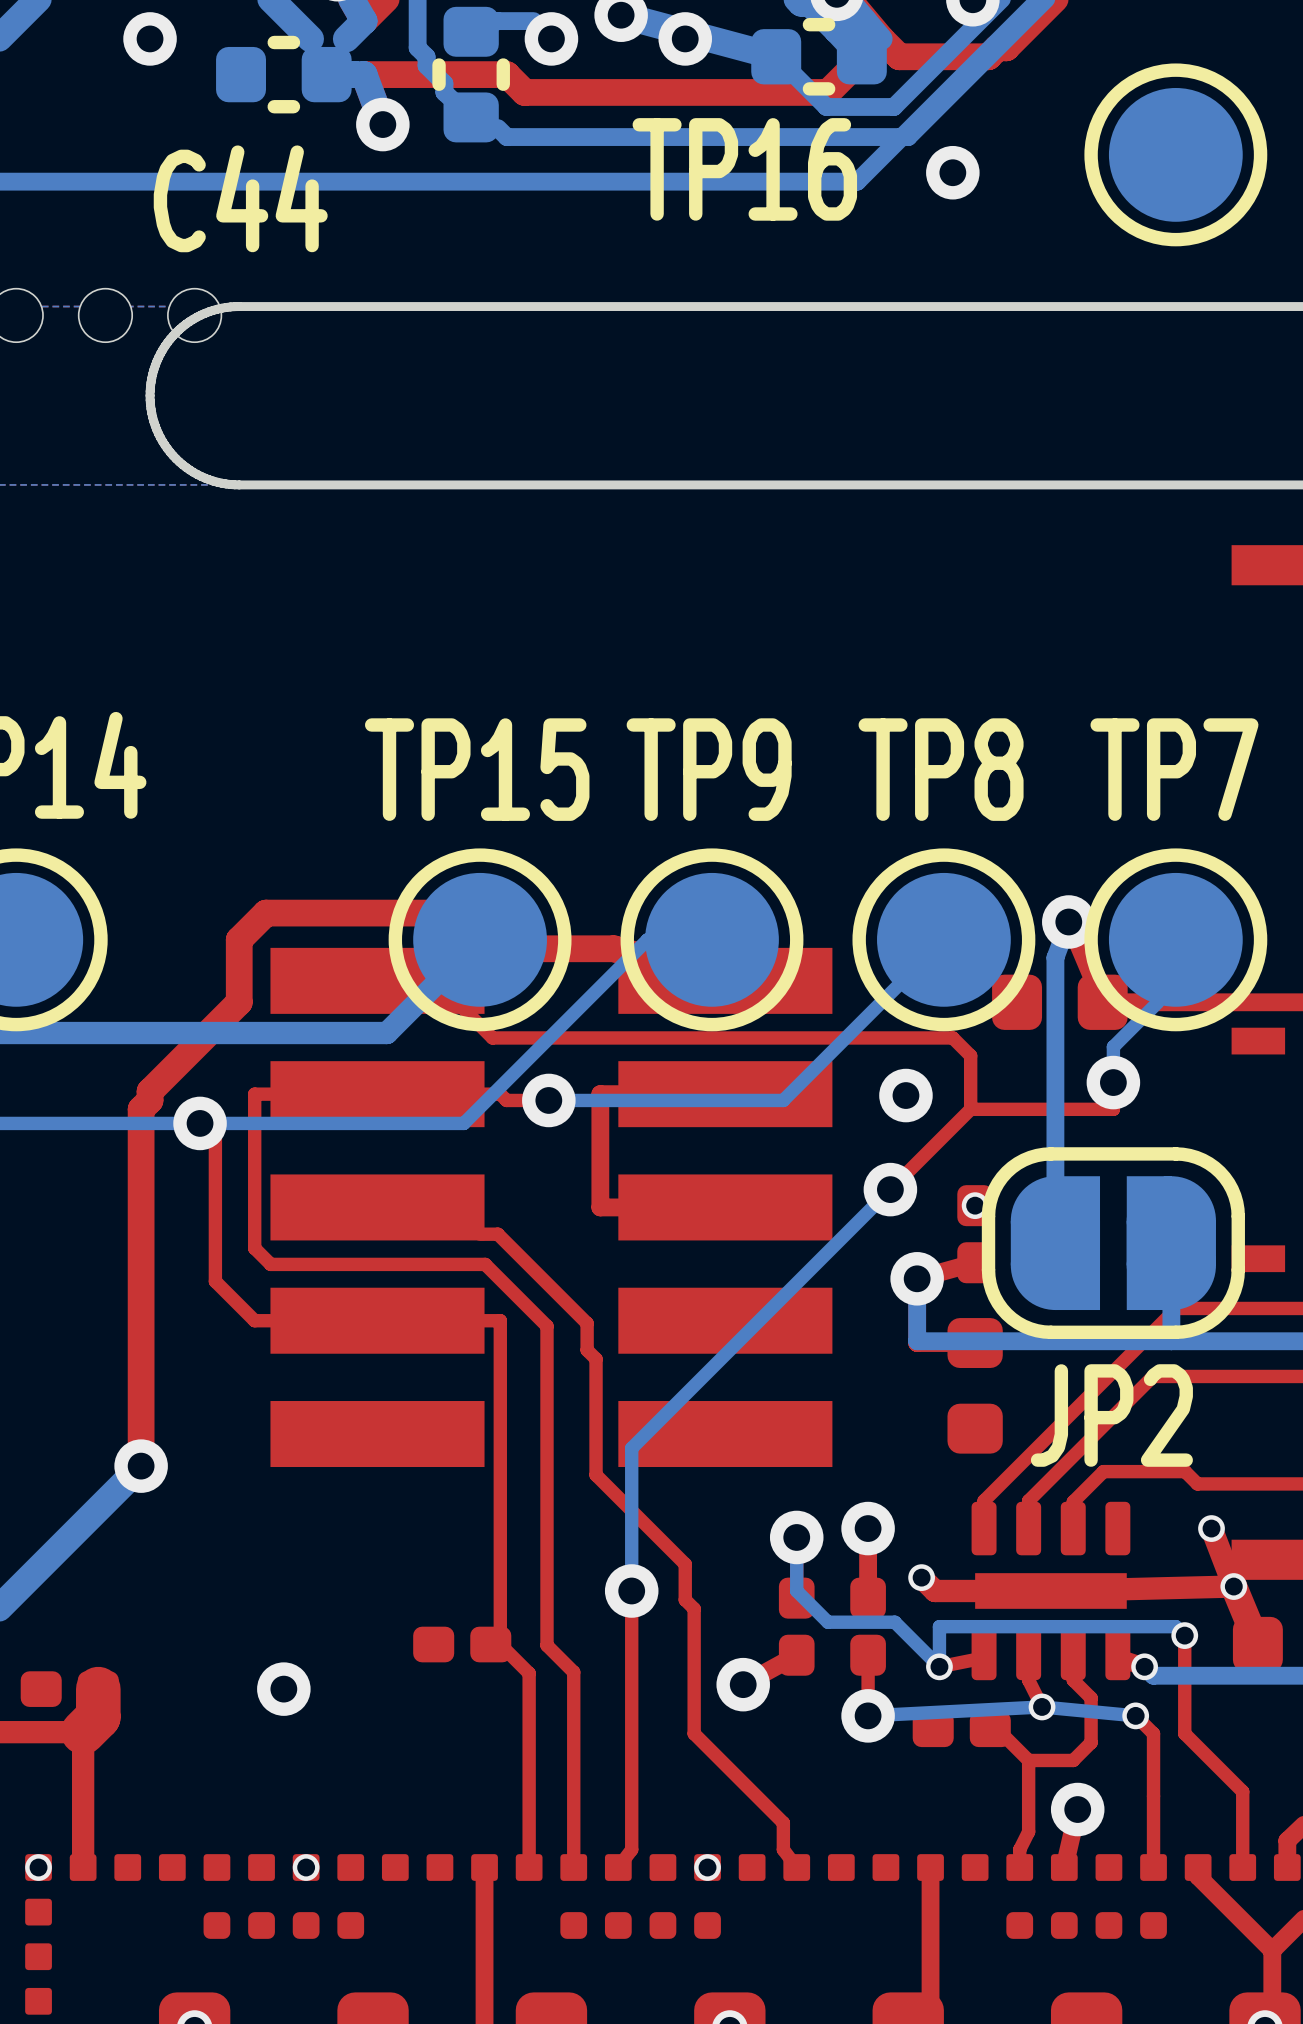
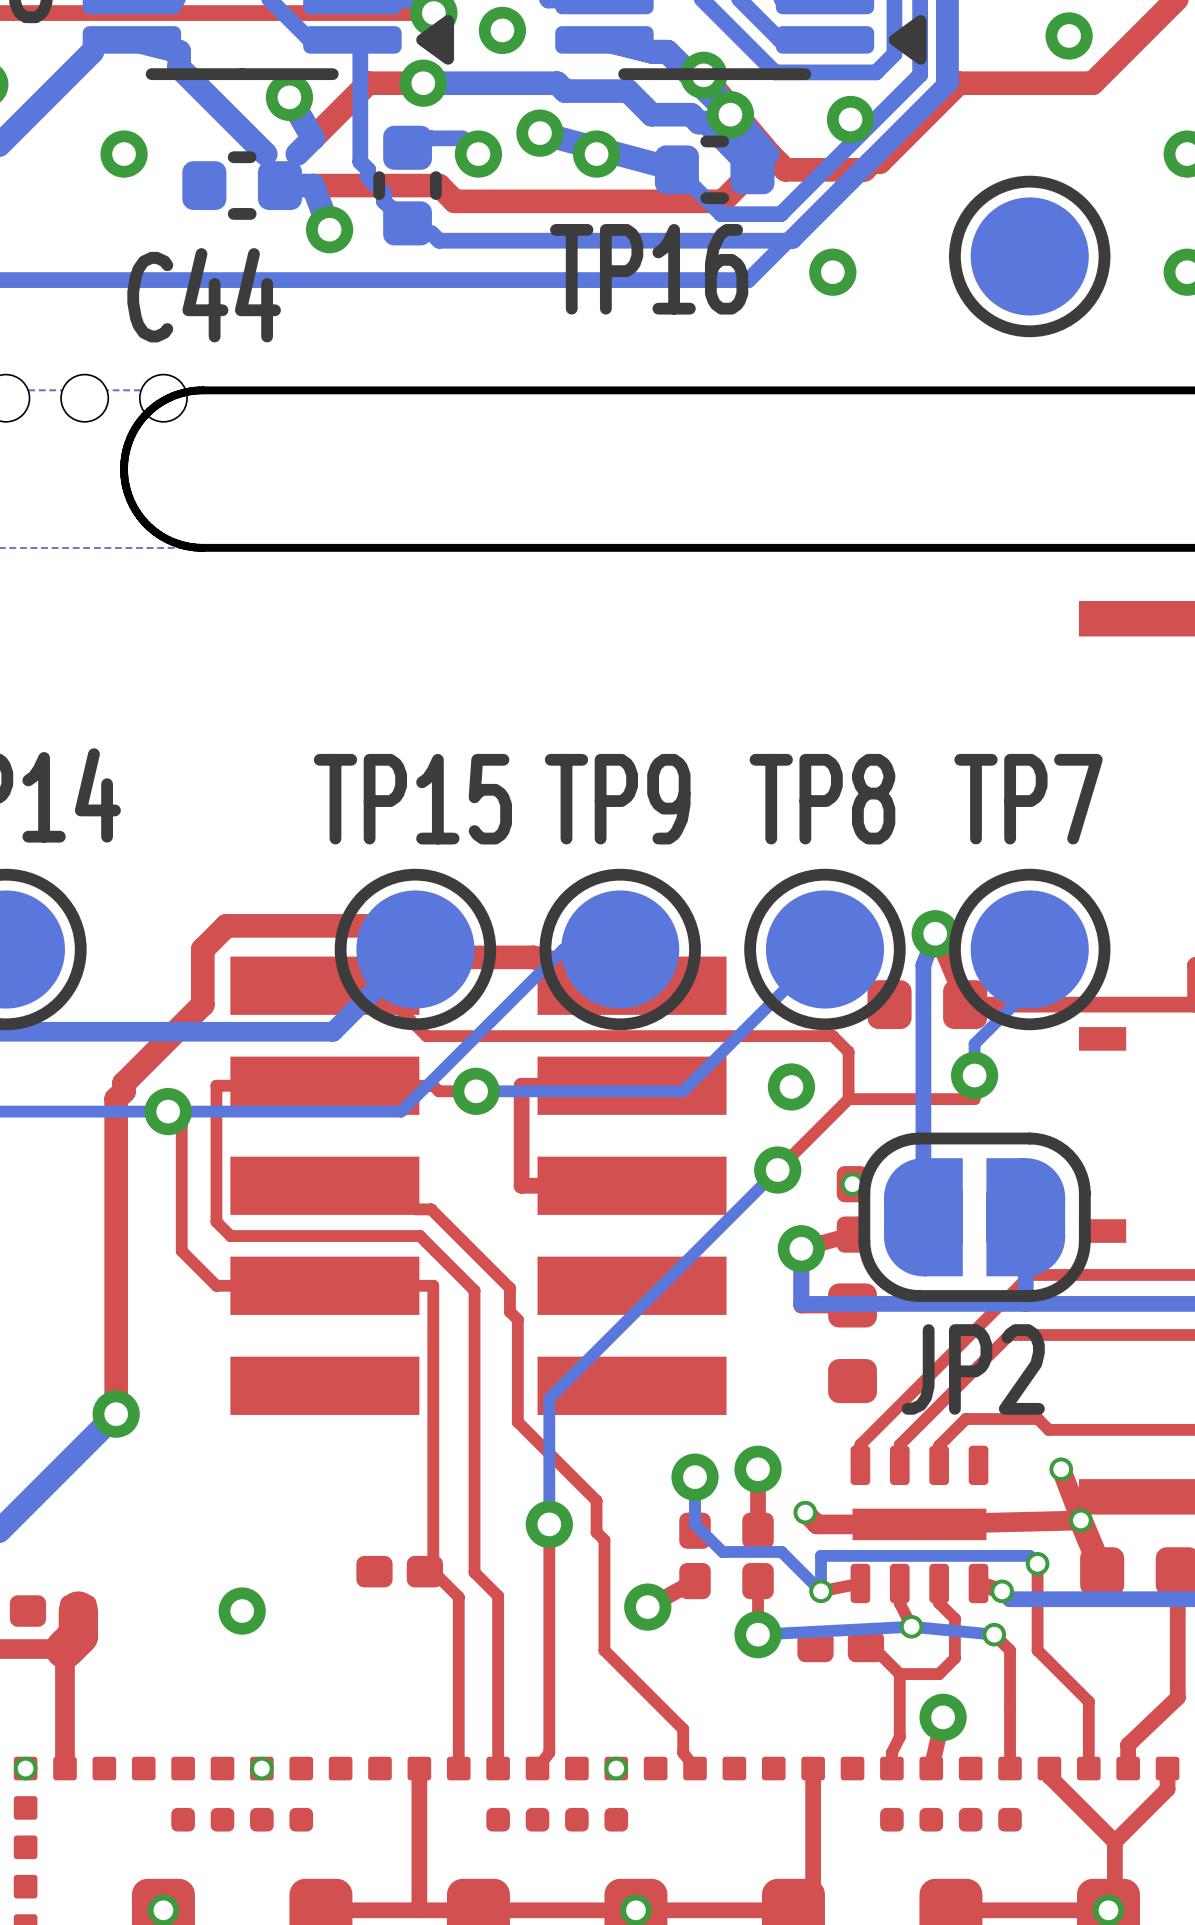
part footprint: [971, 1501, 1131, 1681] -> [850, 1445, 989, 1604]

